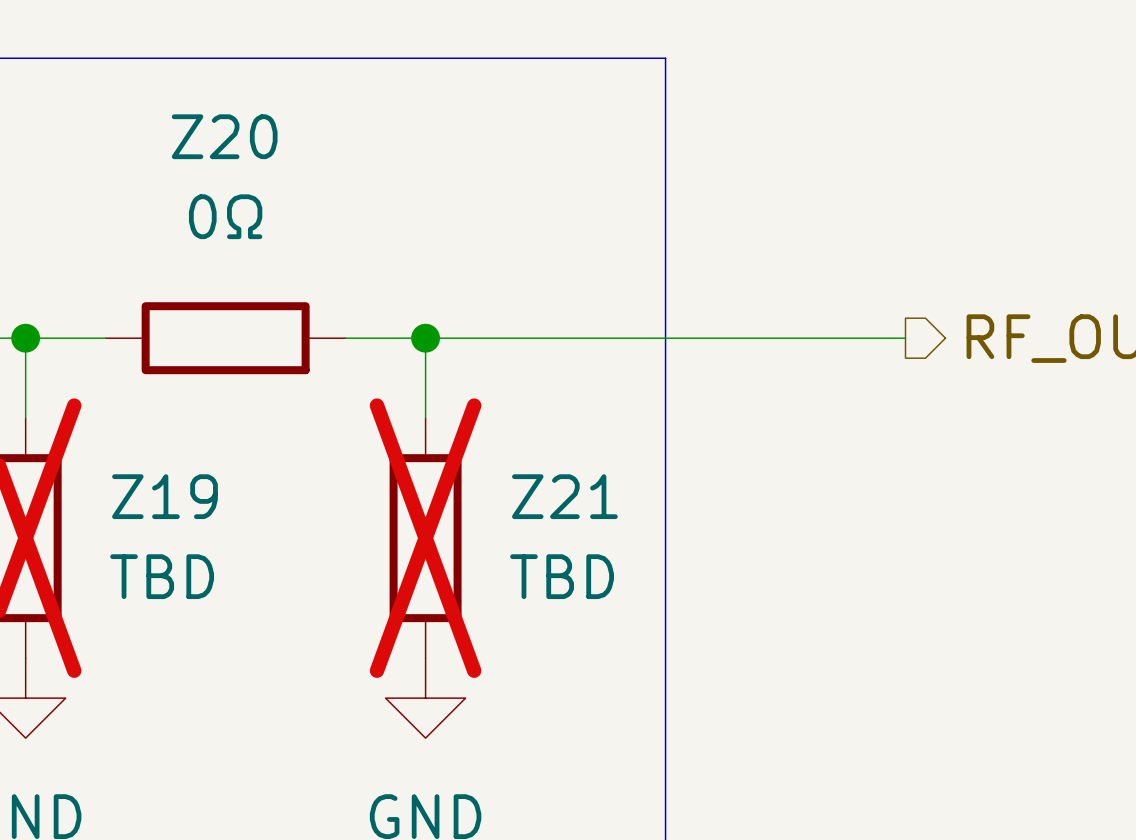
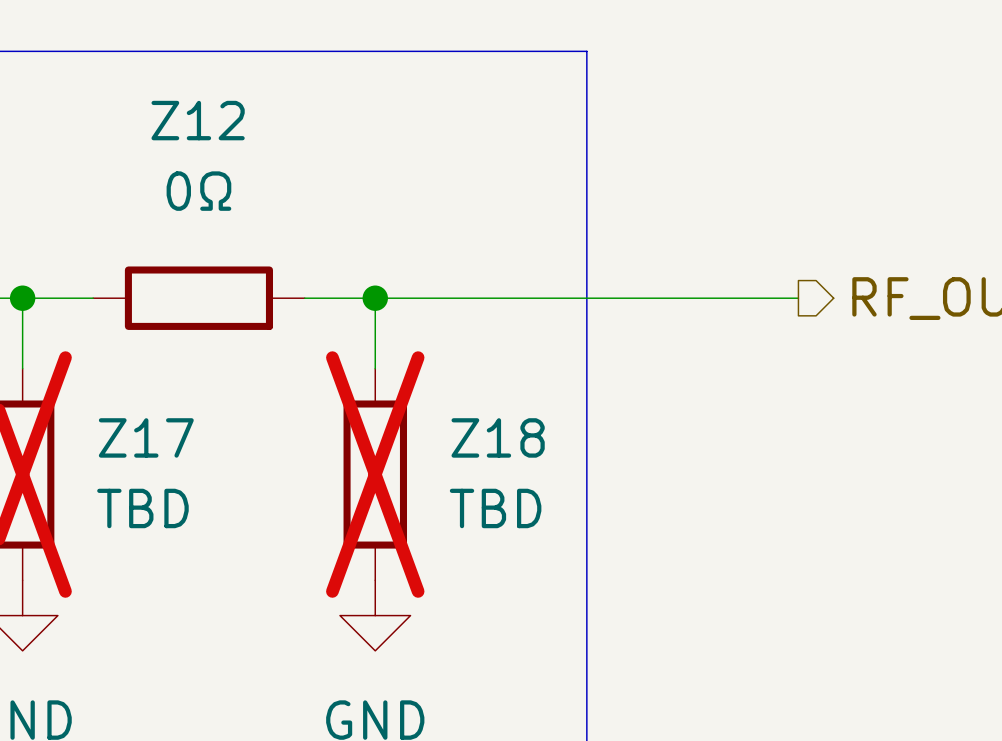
Z20 name: Z20 (224, 136) -> Z12 (198, 120)
Z19 name: Z19 (164, 496) -> Z17 (146, 437)
Z21 name: Z21 (564, 496) -> Z18 (498, 437)

